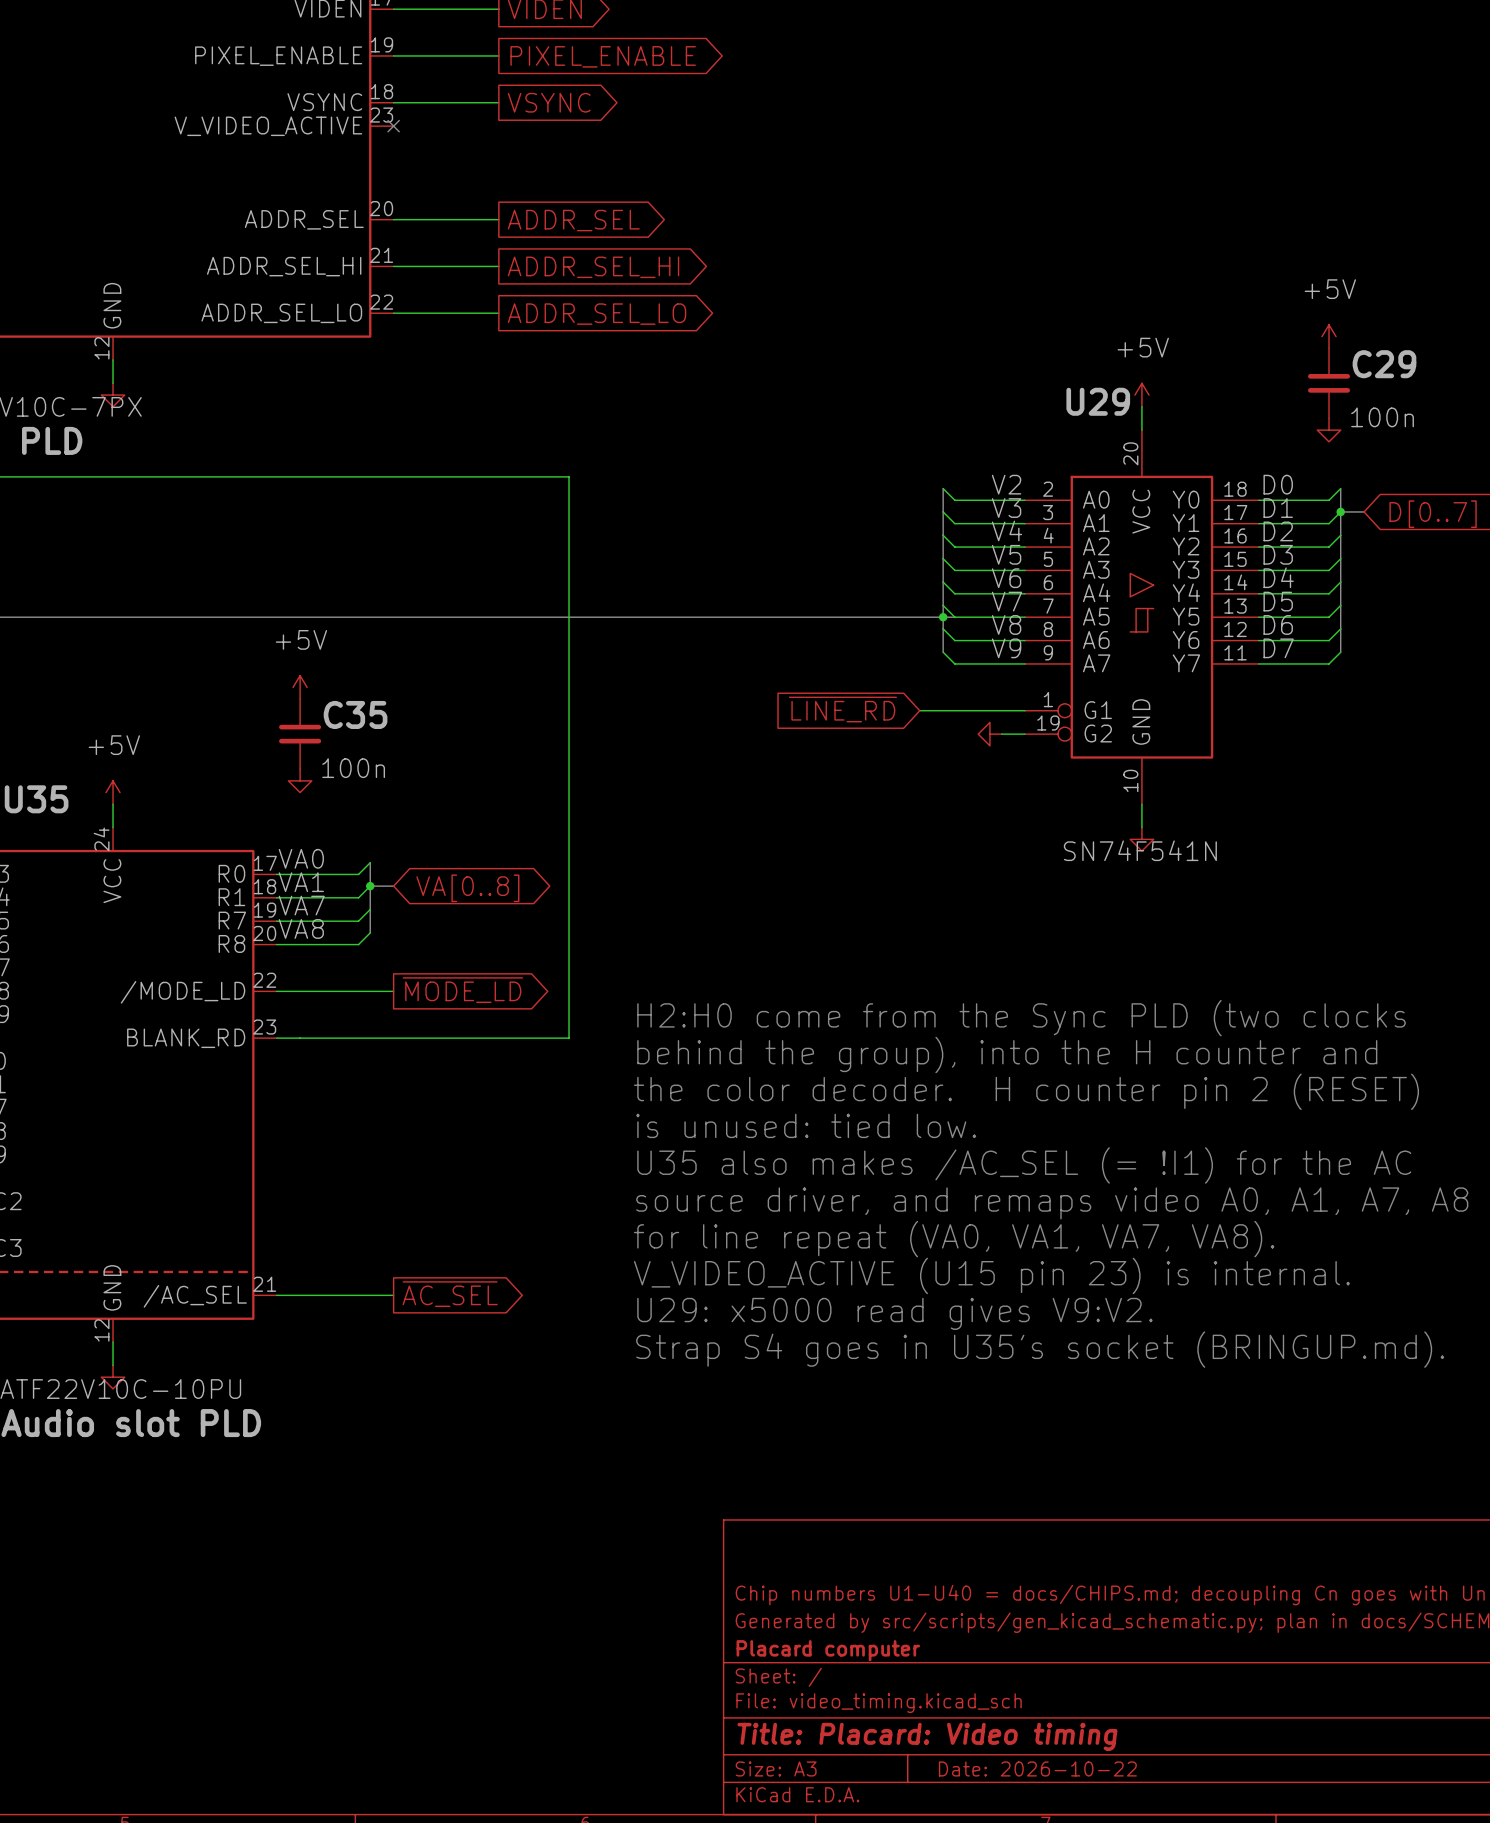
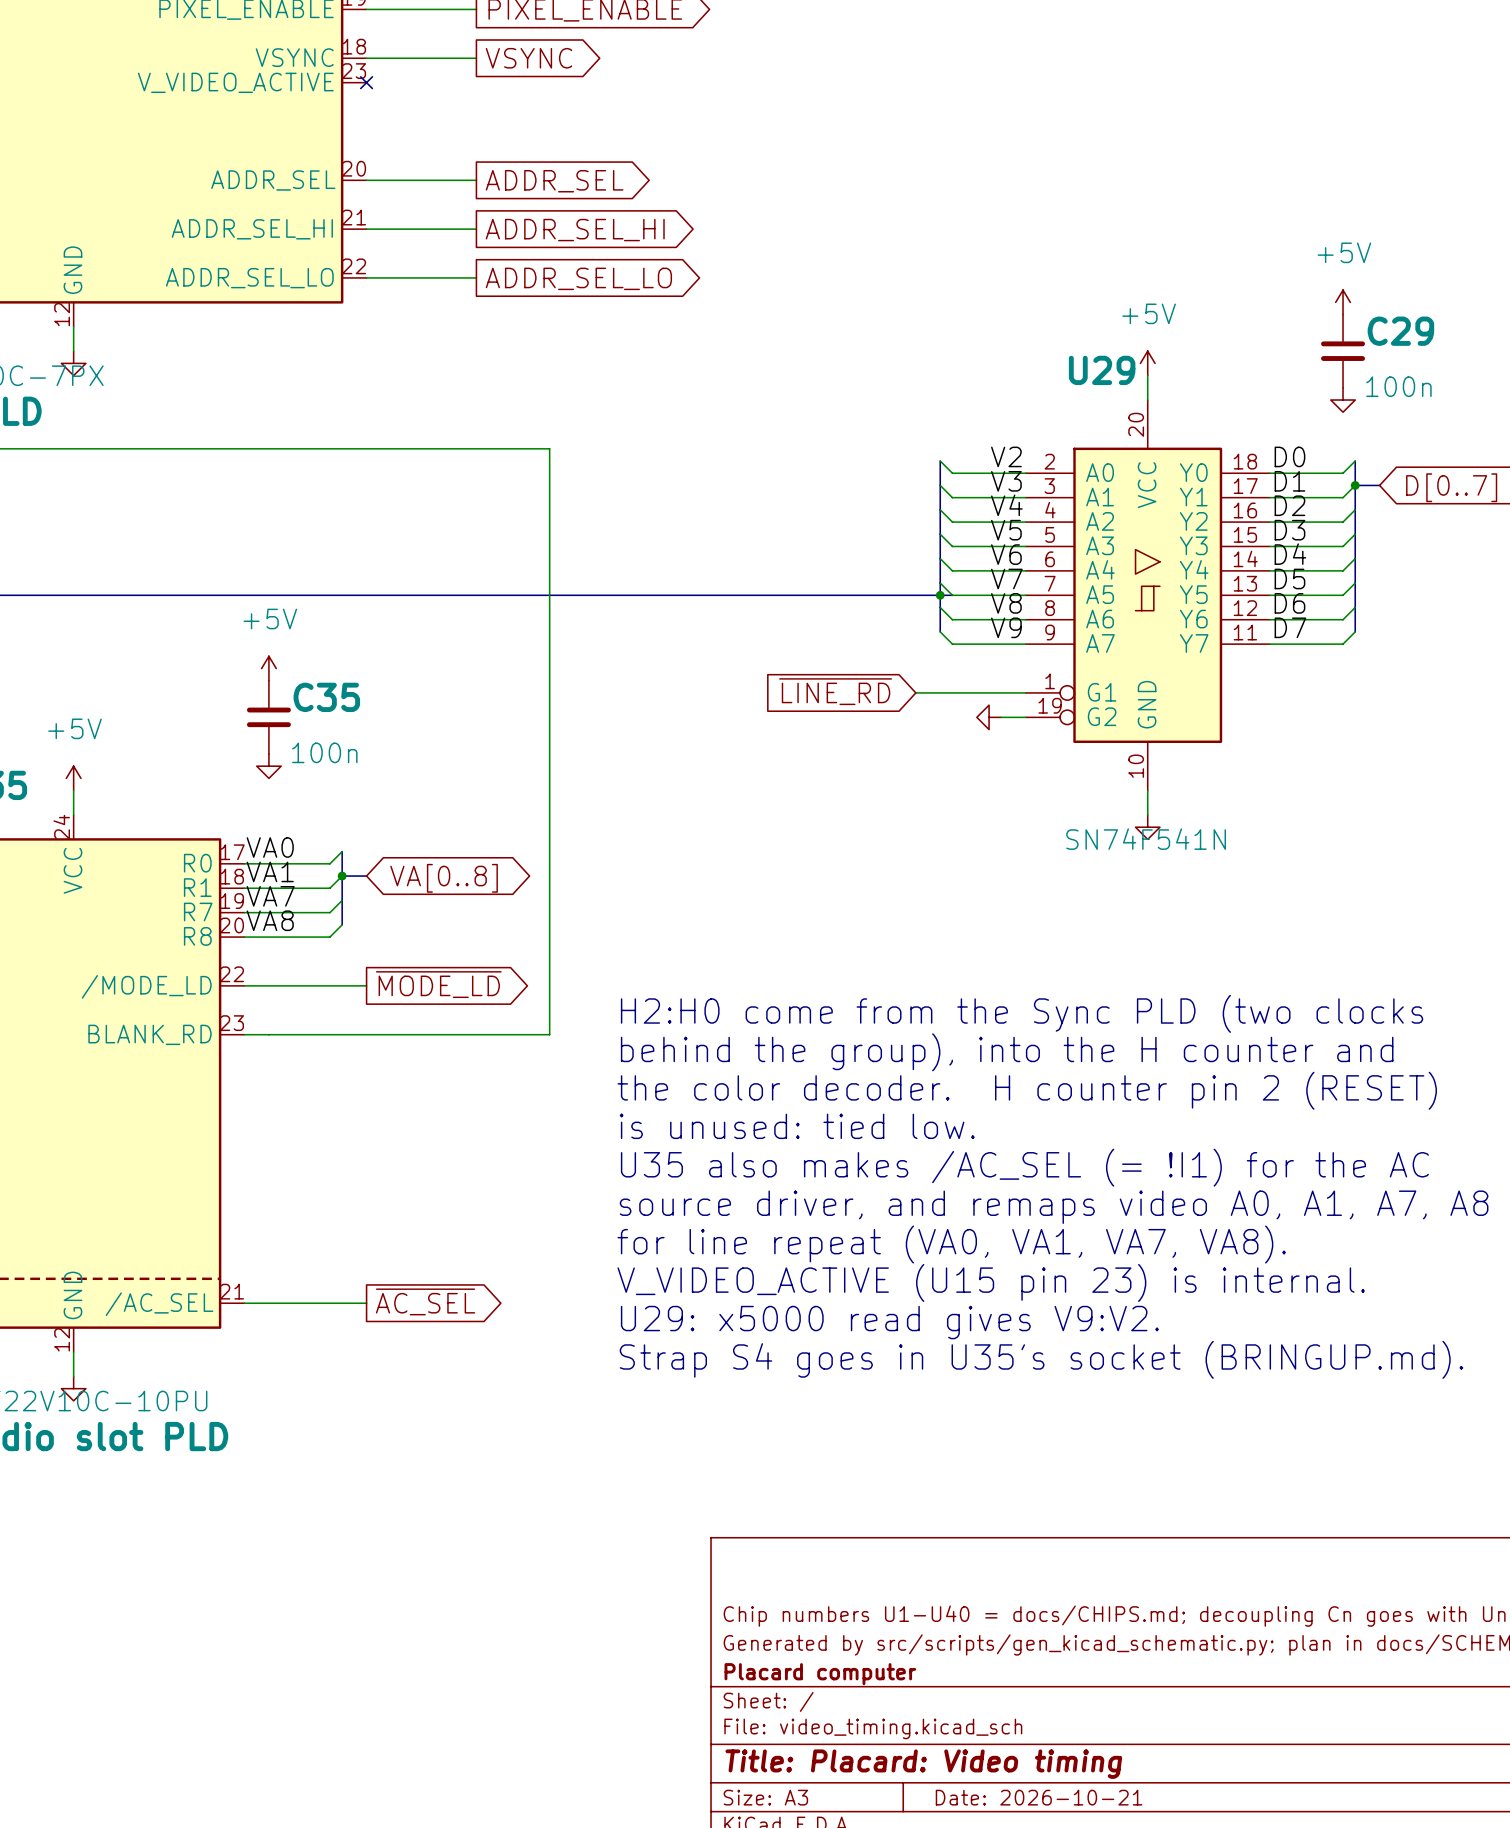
title block: Date: 2026-10-22 (1037, 1768) -> Date: 2026-10-21 (1039, 1797)

